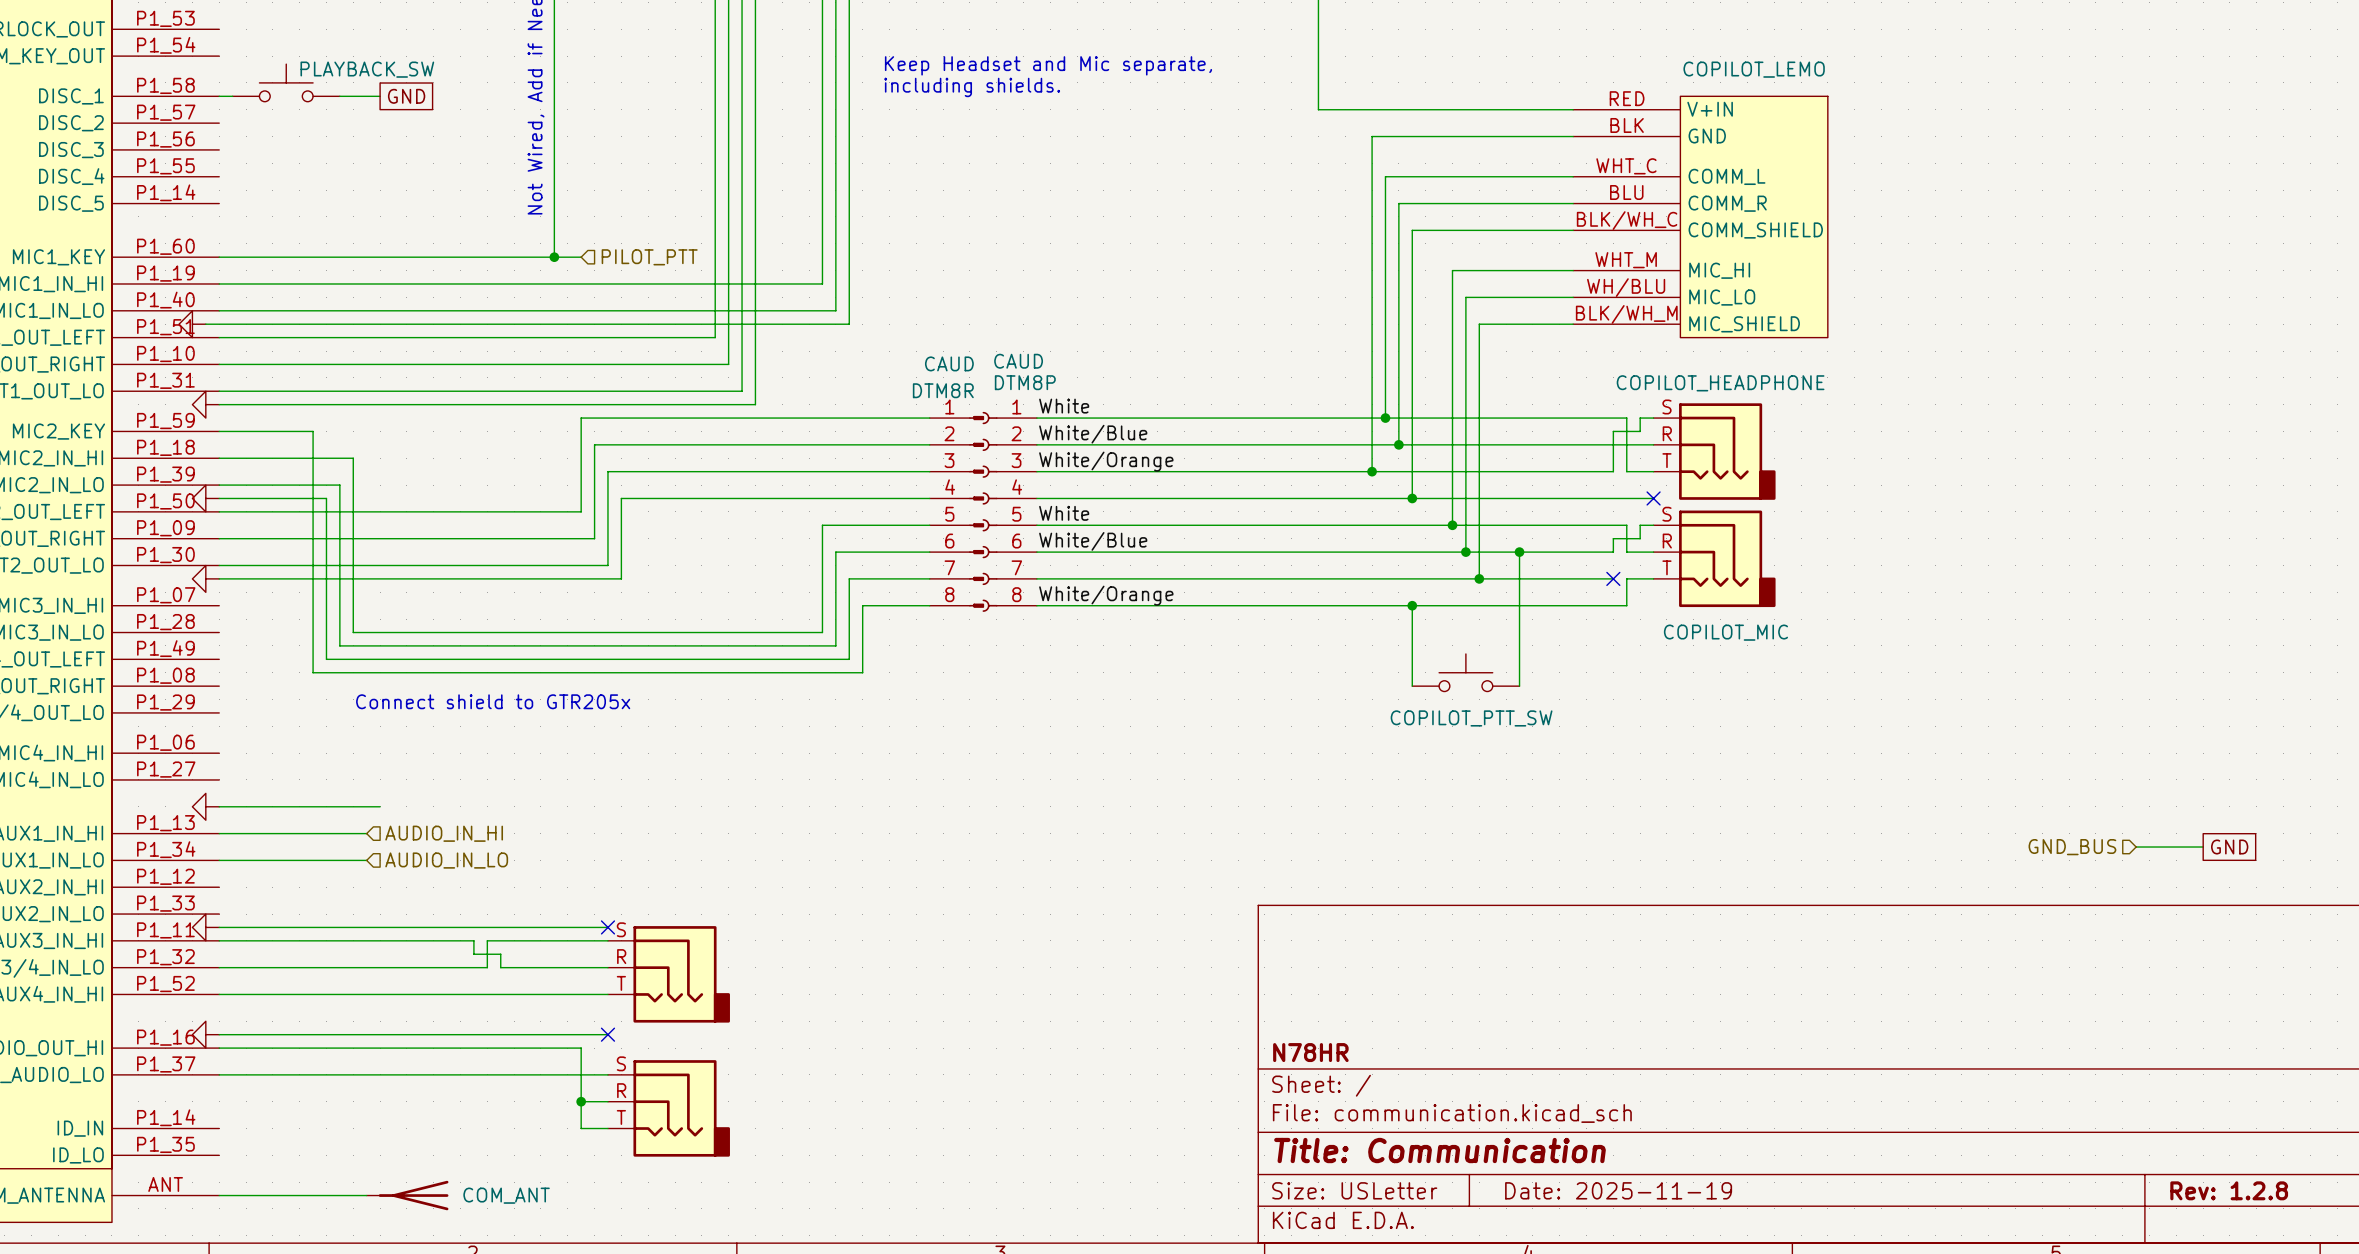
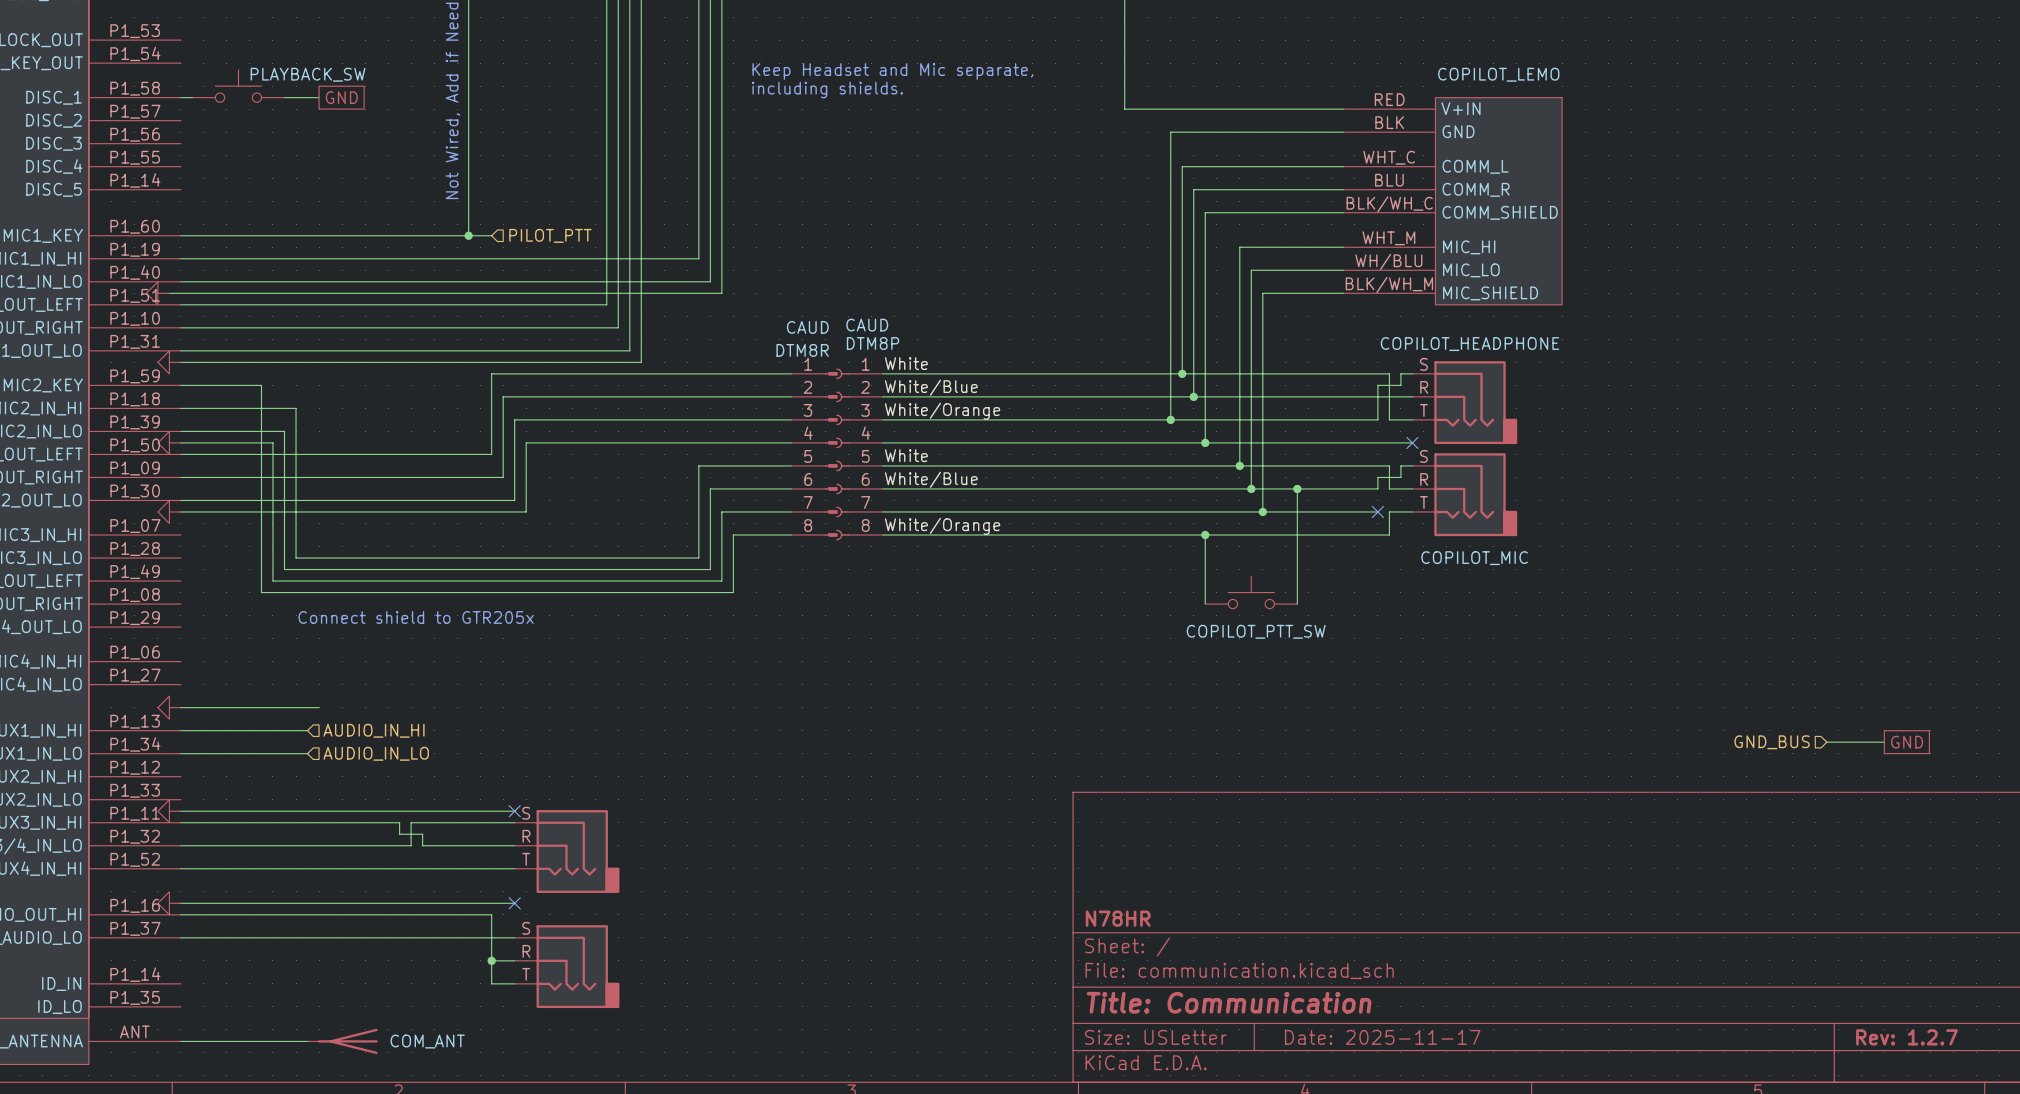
title block: Date: 2025-11-19 (1618, 1190) -> Date: 2025-11-17 (1382, 1037)
title block: Rev: 1.2.8 (2229, 1190) -> Rev: 1.2.7 (1906, 1037)

